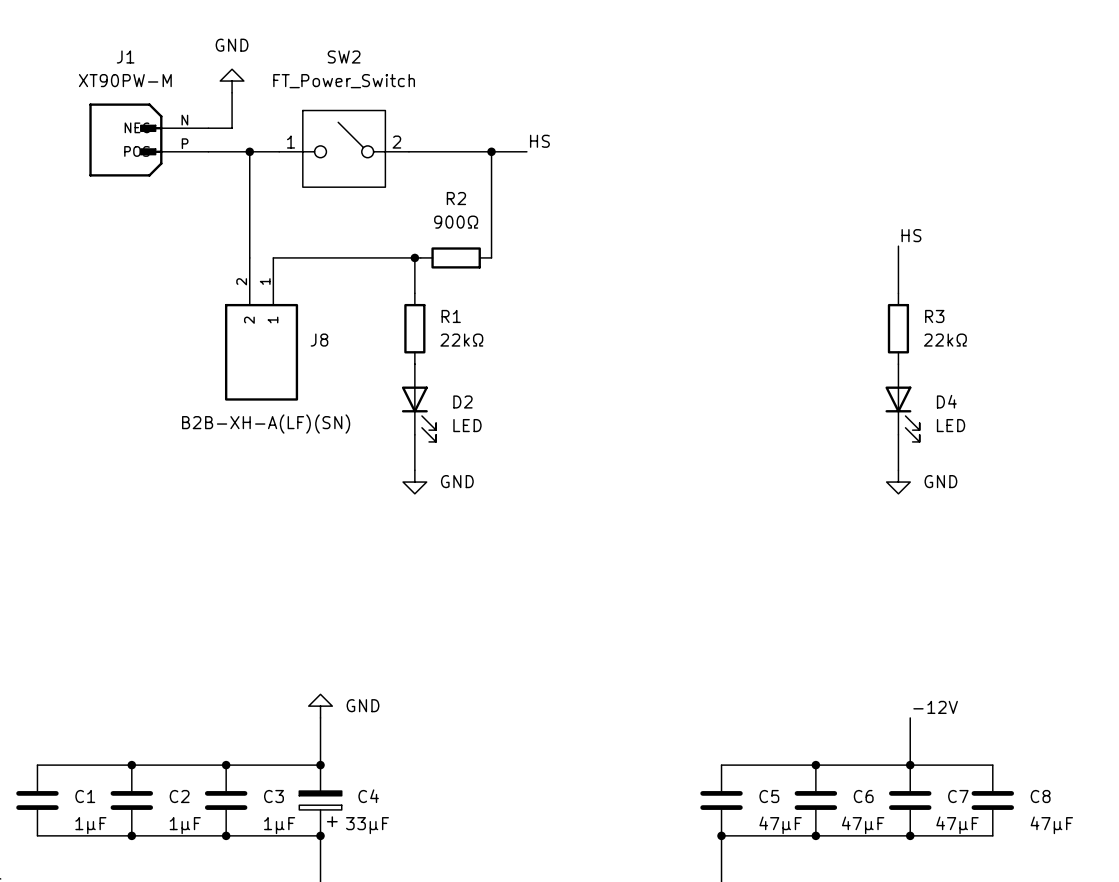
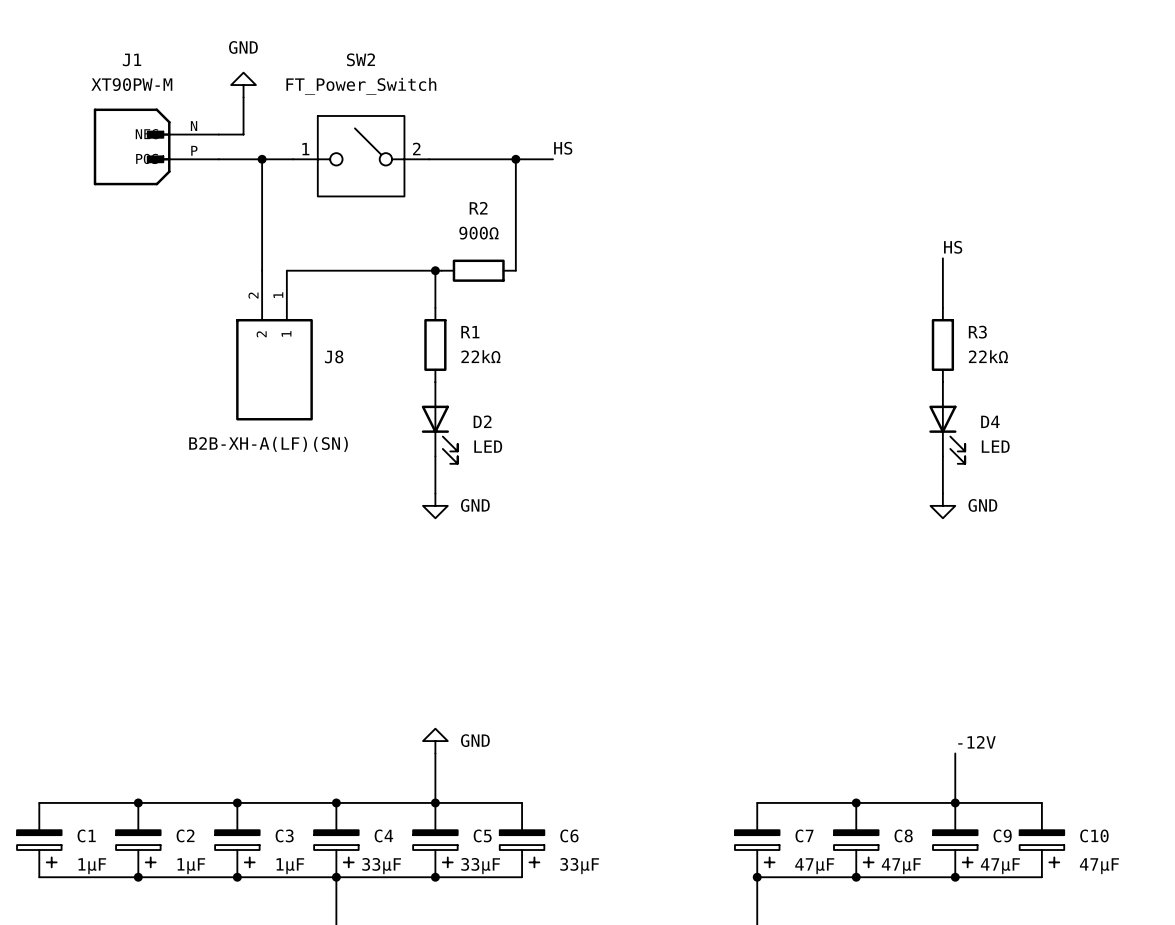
power symbol position: GND (320, 706) -> GND (435, 741)
wire: (320, 717) (320, 765) -> (522, 802) (336, 802)
wire: none -> (435, 753) (435, 802)
C1 symbol: [16, 765, 59, 836] -> [17, 802, 62, 878]
C2 symbol: [110, 765, 154, 836] -> [116, 802, 161, 878]
C3 symbol: [204, 765, 248, 836] -> [215, 802, 260, 878]
junction: none -> (435, 802)
C5 symbol: [700, 765, 743, 836] -> [413, 802, 458, 878]
C6 symbol: [794, 765, 838, 836] -> [499, 802, 545, 878]
C7 symbol: [889, 765, 932, 836] -> [734, 802, 780, 878]
C8 symbol: [971, 765, 1015, 836] -> [833, 802, 879, 878]
C9: none -> 47μF (955, 840)
C10: none -> 47μF (1041, 840)
C5 value: 47μF (780, 825) -> 33μF (480, 866)
C6 value: 47μF (863, 825) -> 33μF (579, 866)
wire: none -> (336, 877) (522, 877)
junction: none -> (435, 877)

